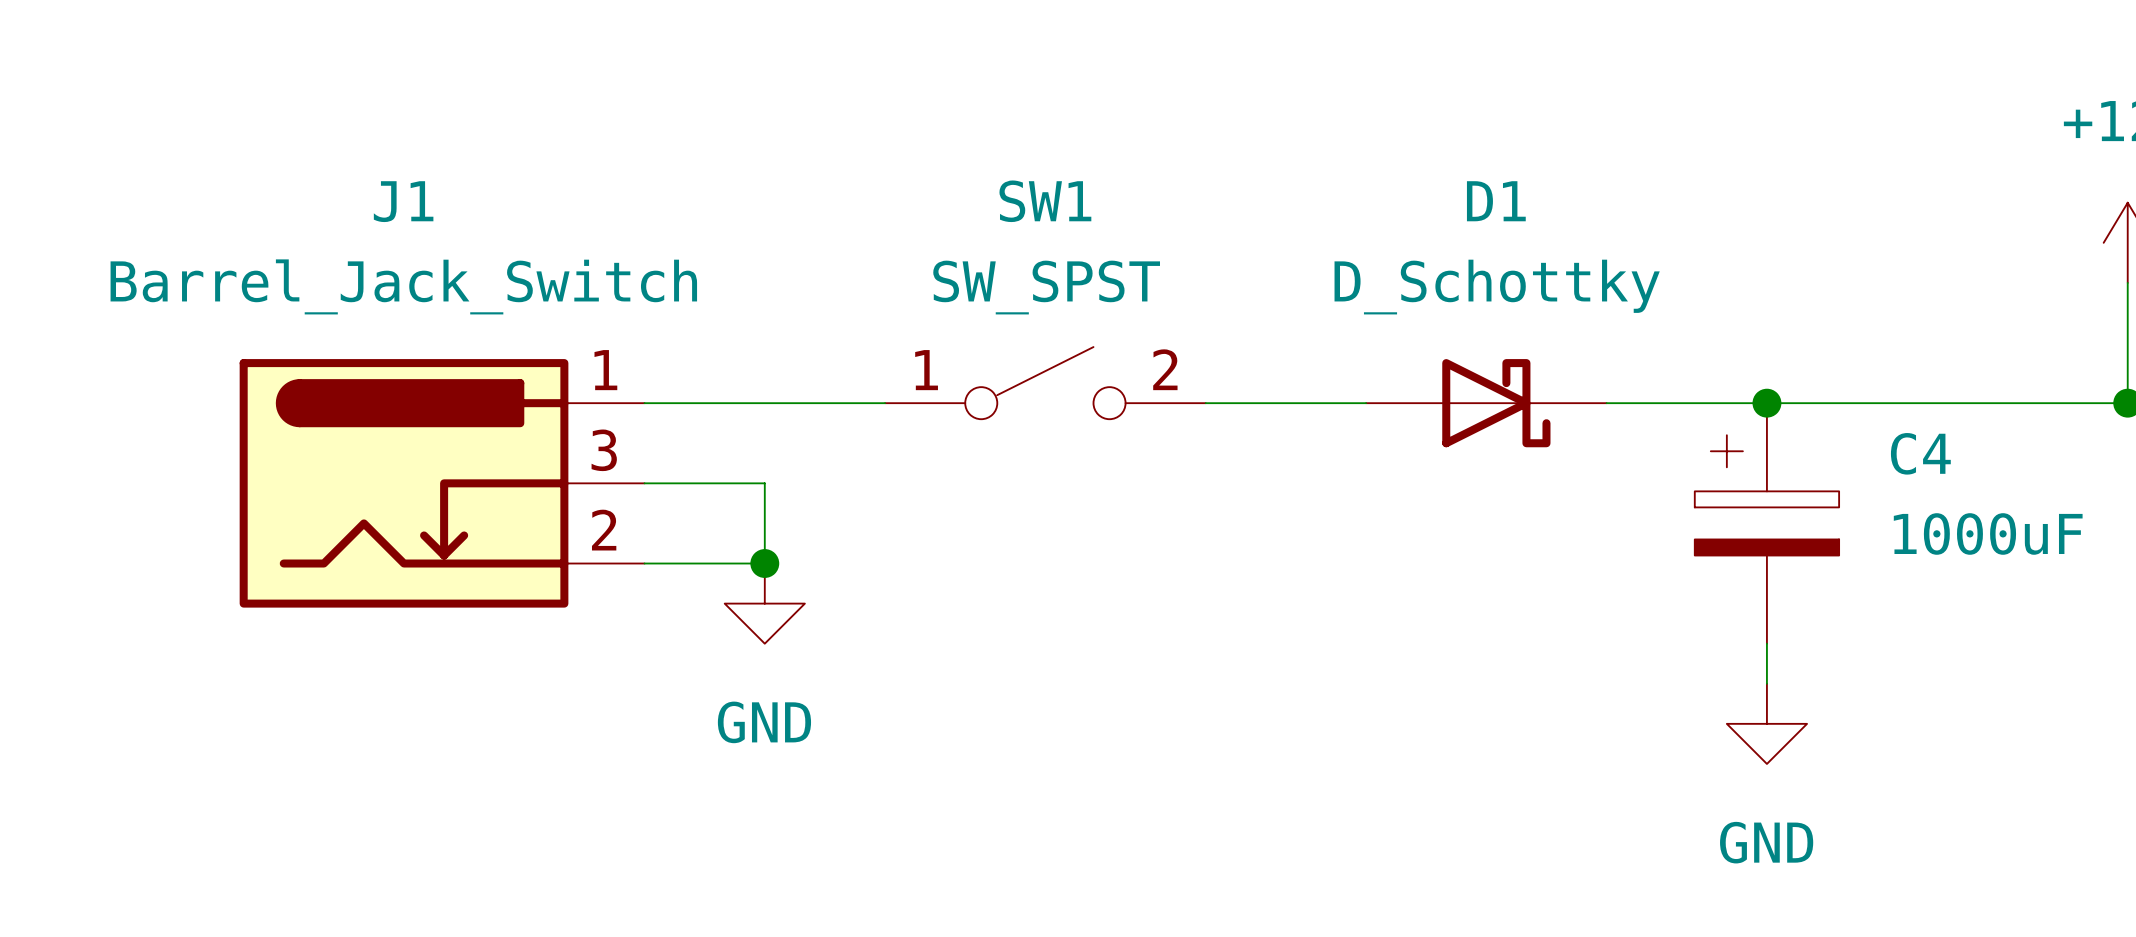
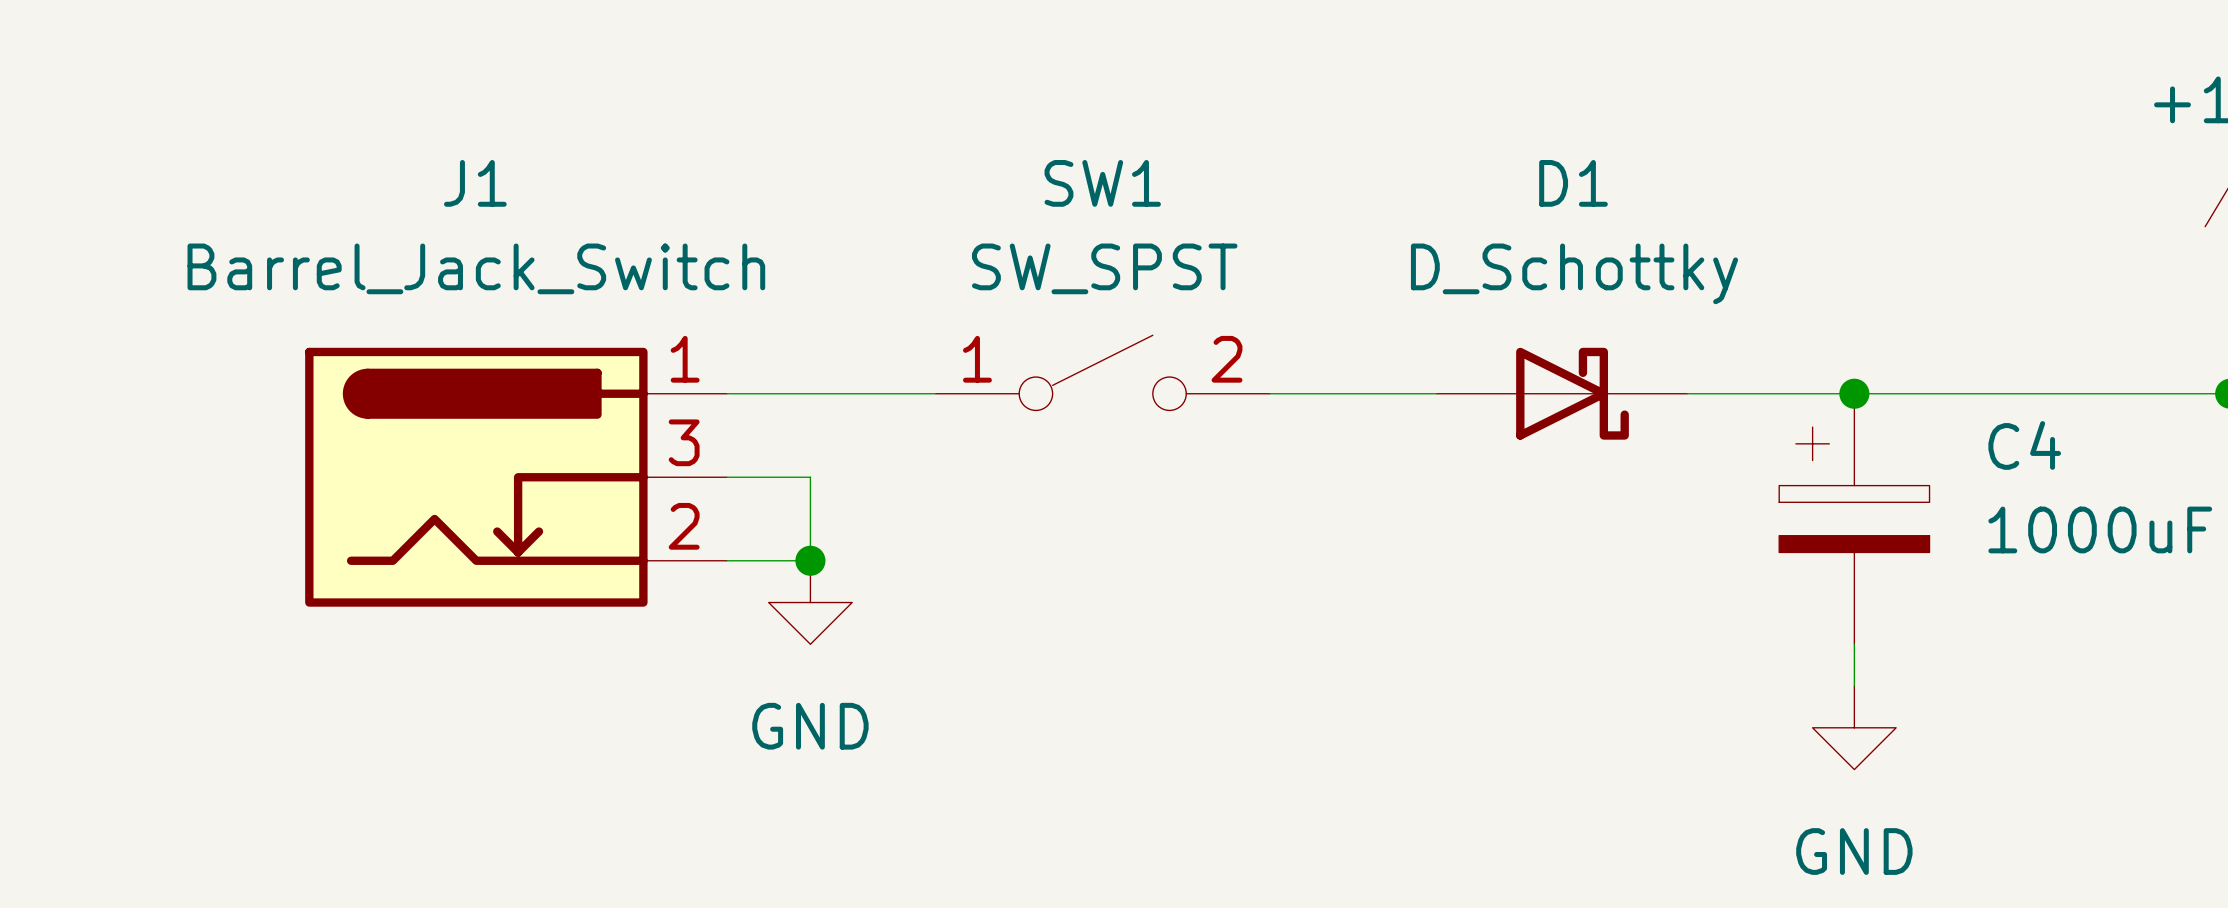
J1 position: (442, 483) -> (516, 477)

